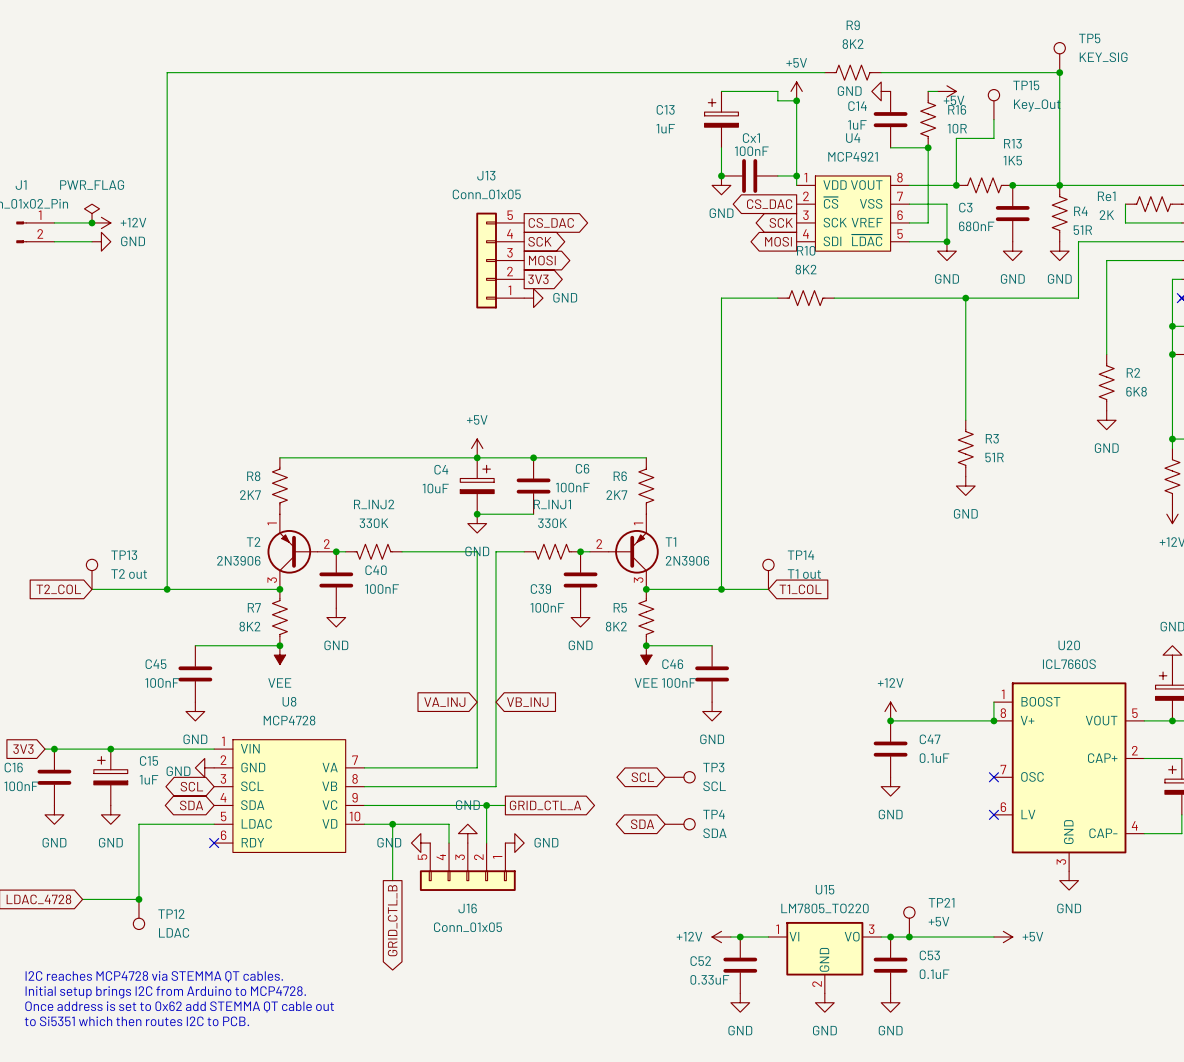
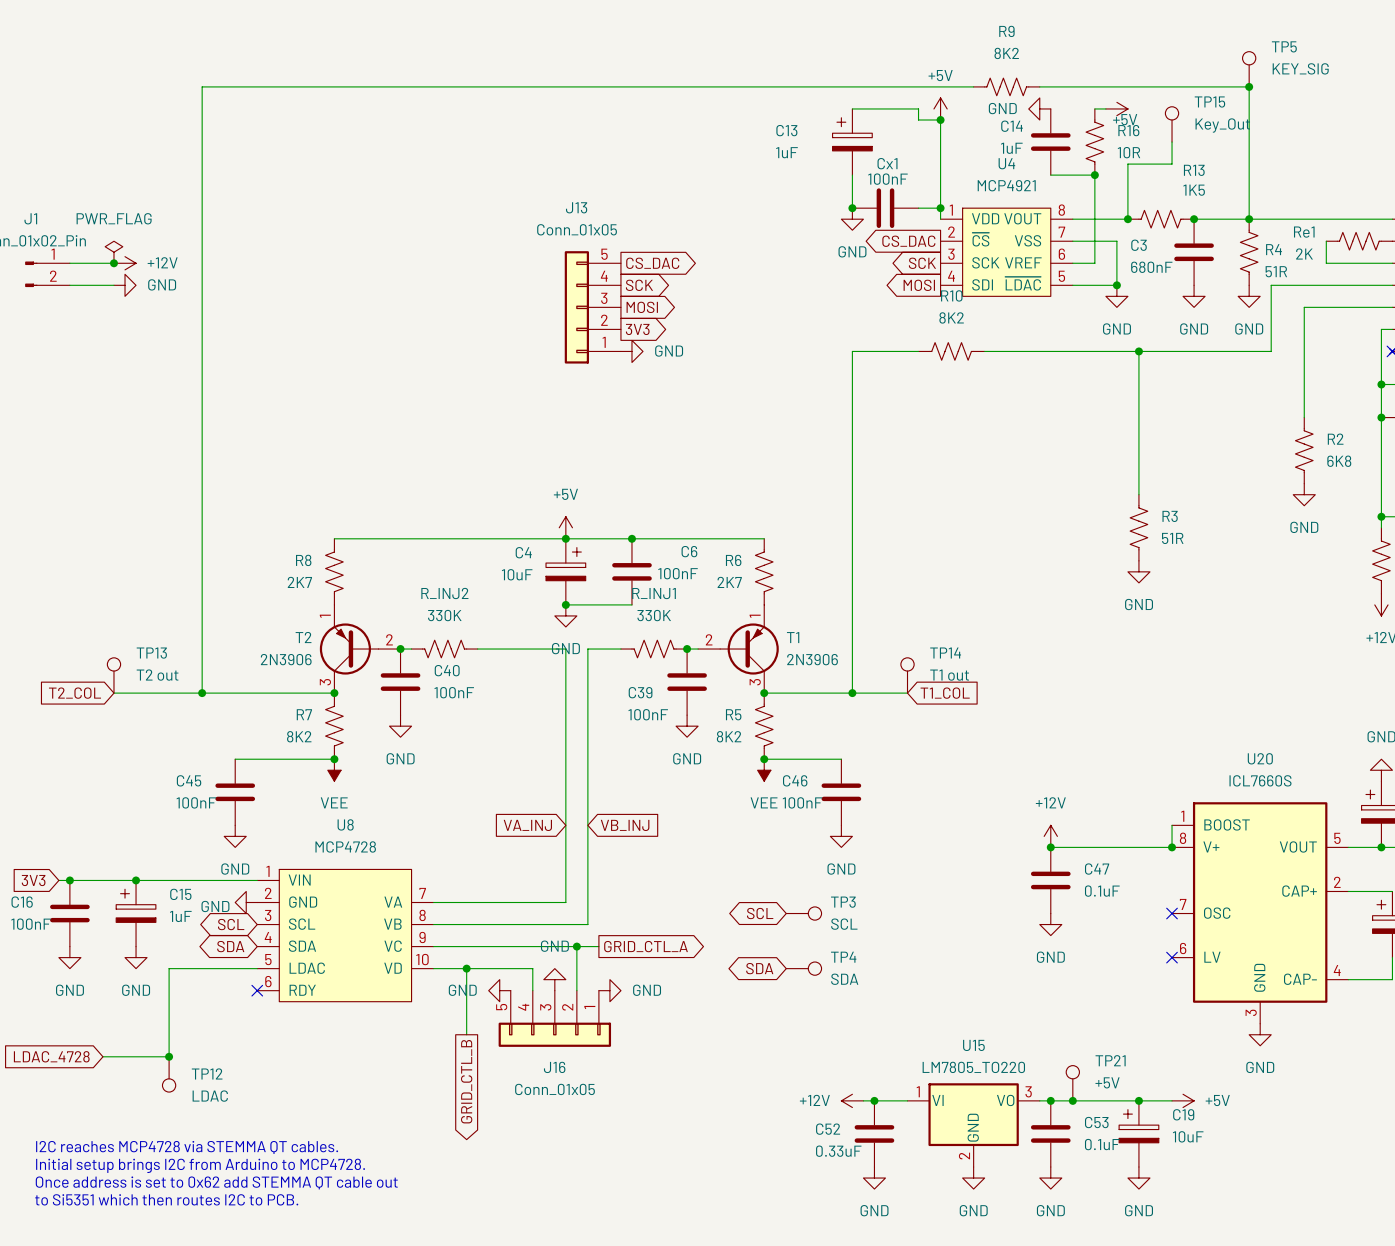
junction: none -> (1138, 1100)
C19: none -> 10uF (1138, 1133)
power symbol: none -> GND (1138, 1178)

